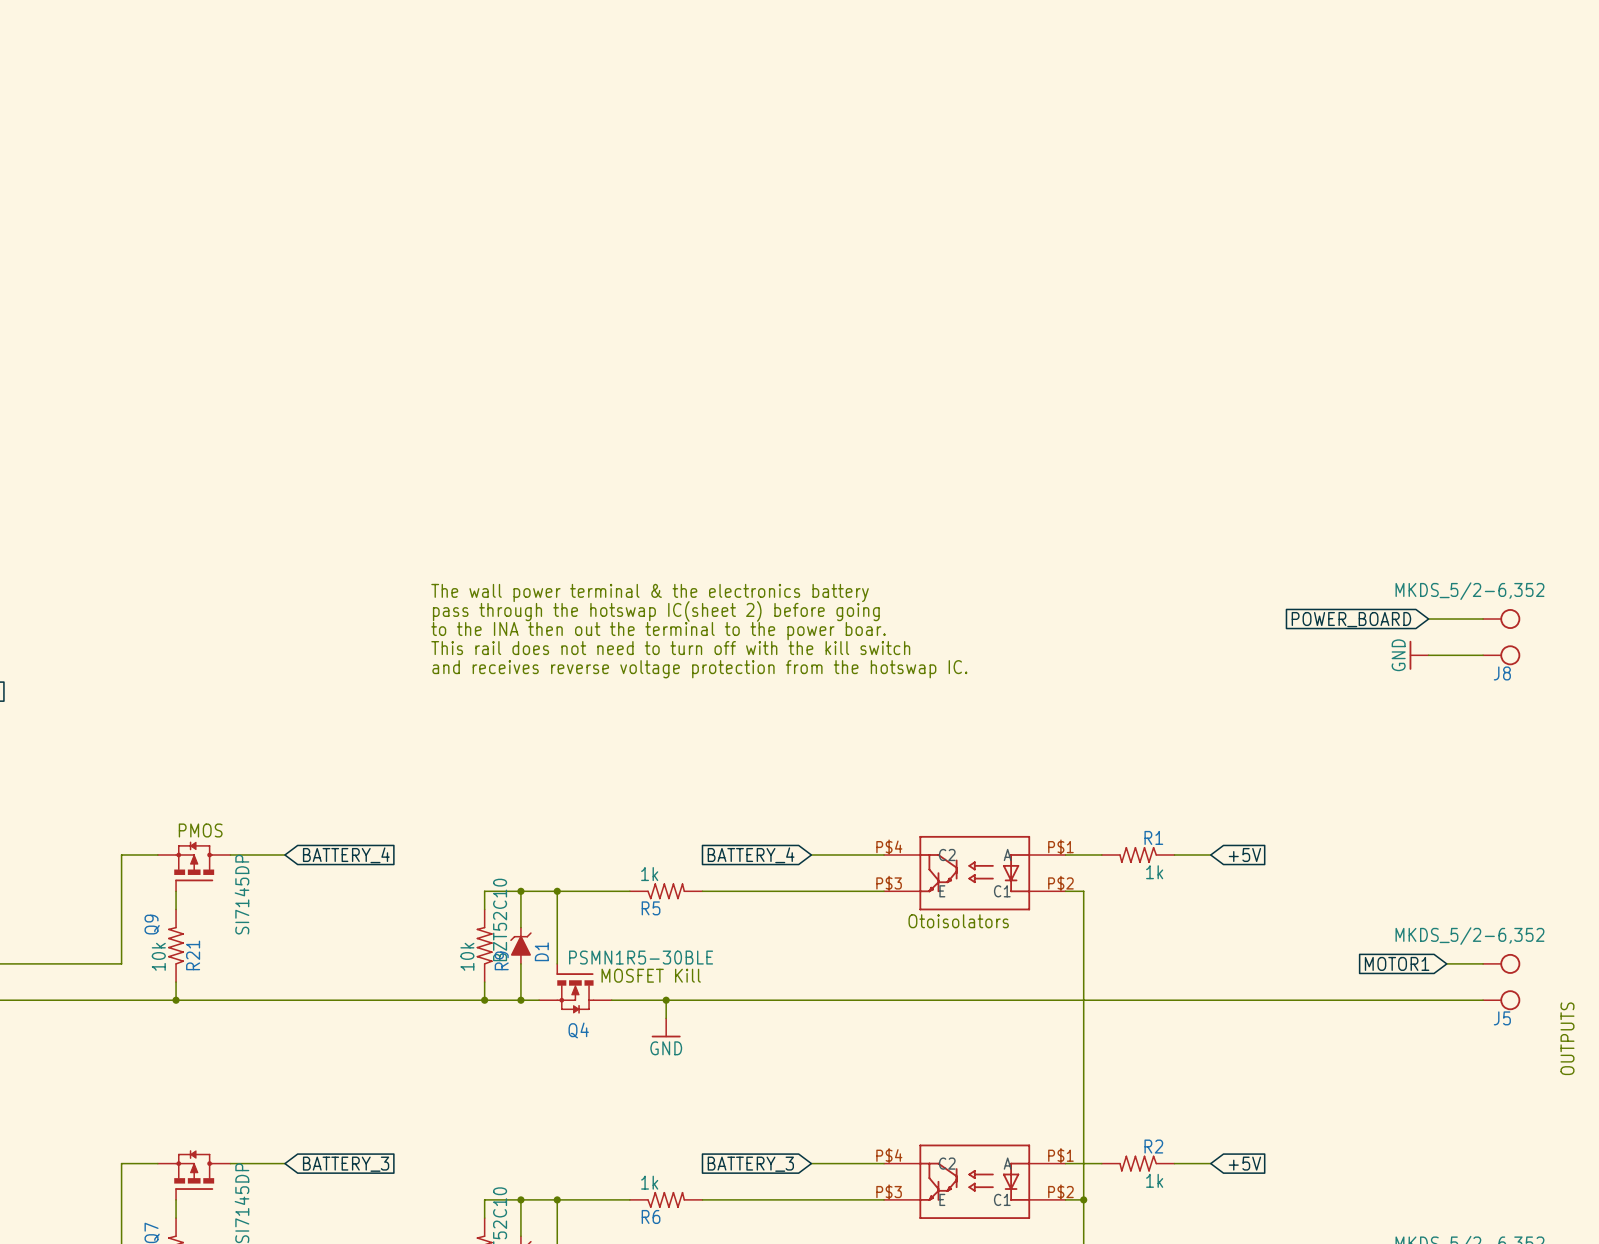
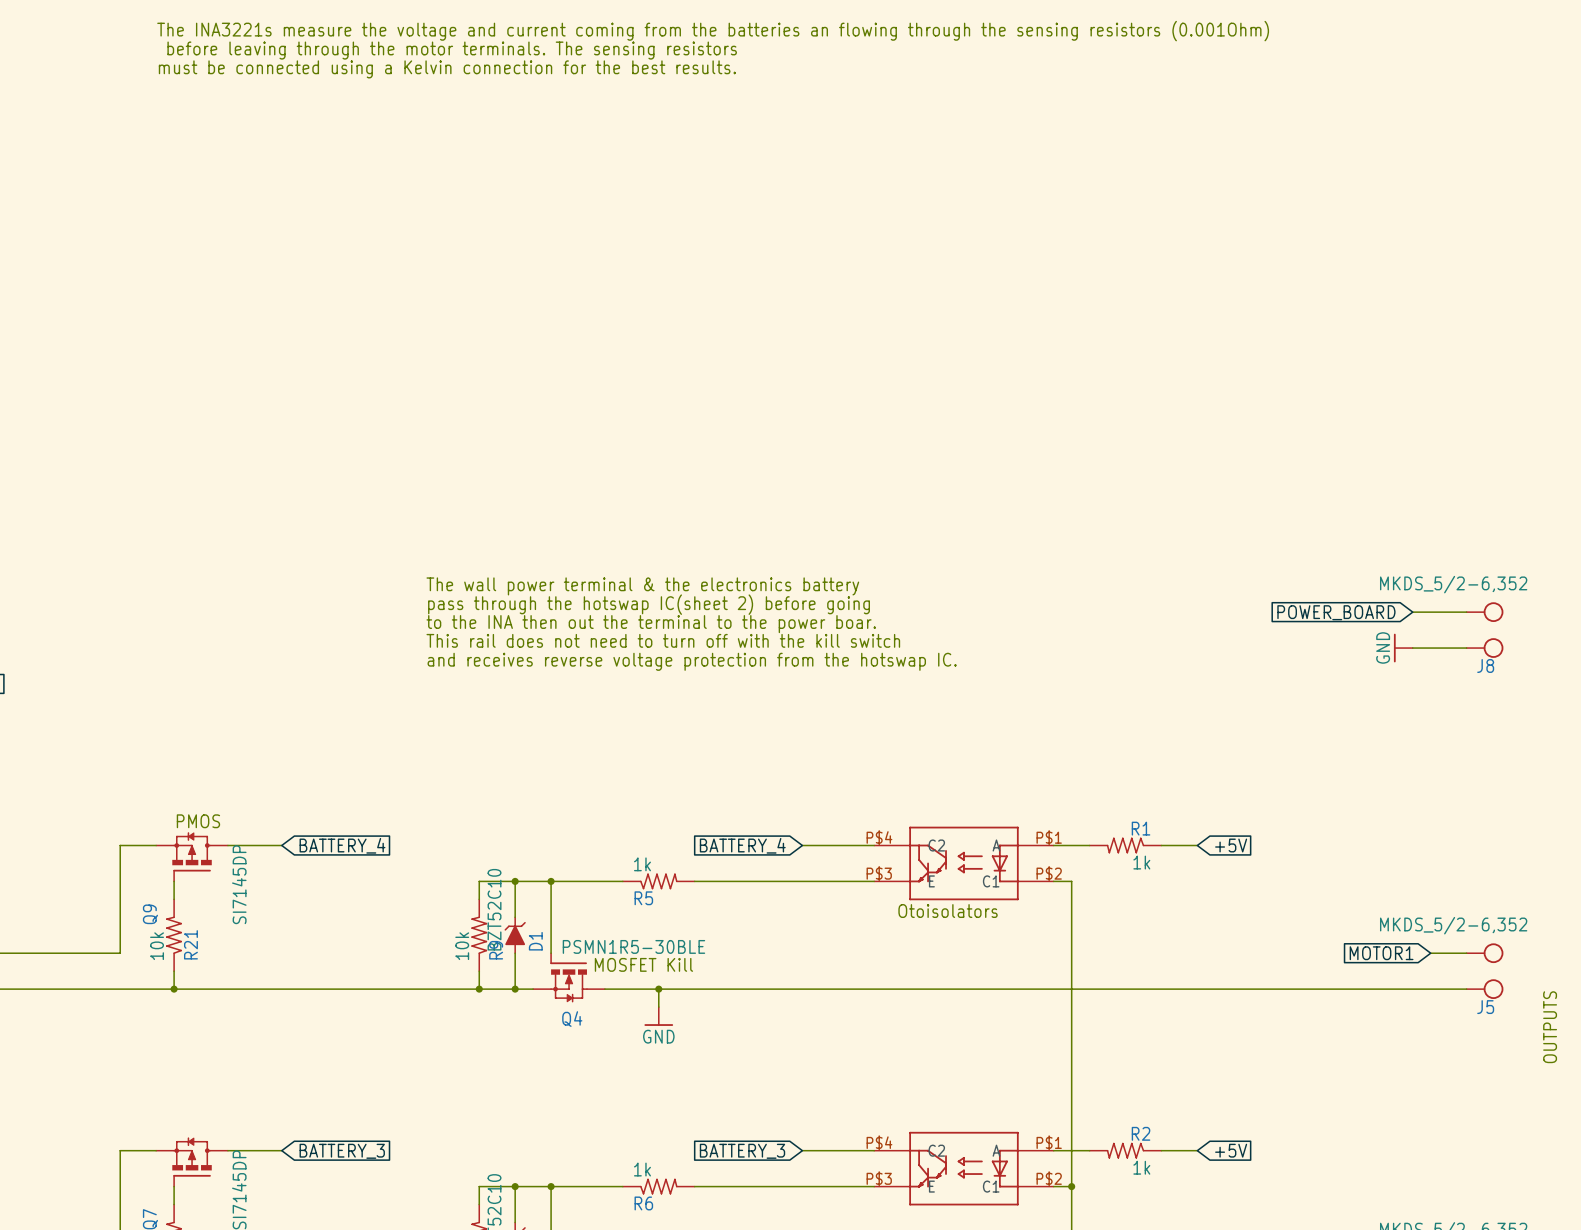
text: none -> The INA3221s measure the voltage and current coming from the batteries an flowing through the sensing resistors (0.001Ohm) (713, 31)
text: none -> before leaving through the motor terminals. The sensing resistors (452, 50)
text: none -> must be connected using a Kelvin connection for the best results. (447, 69)

